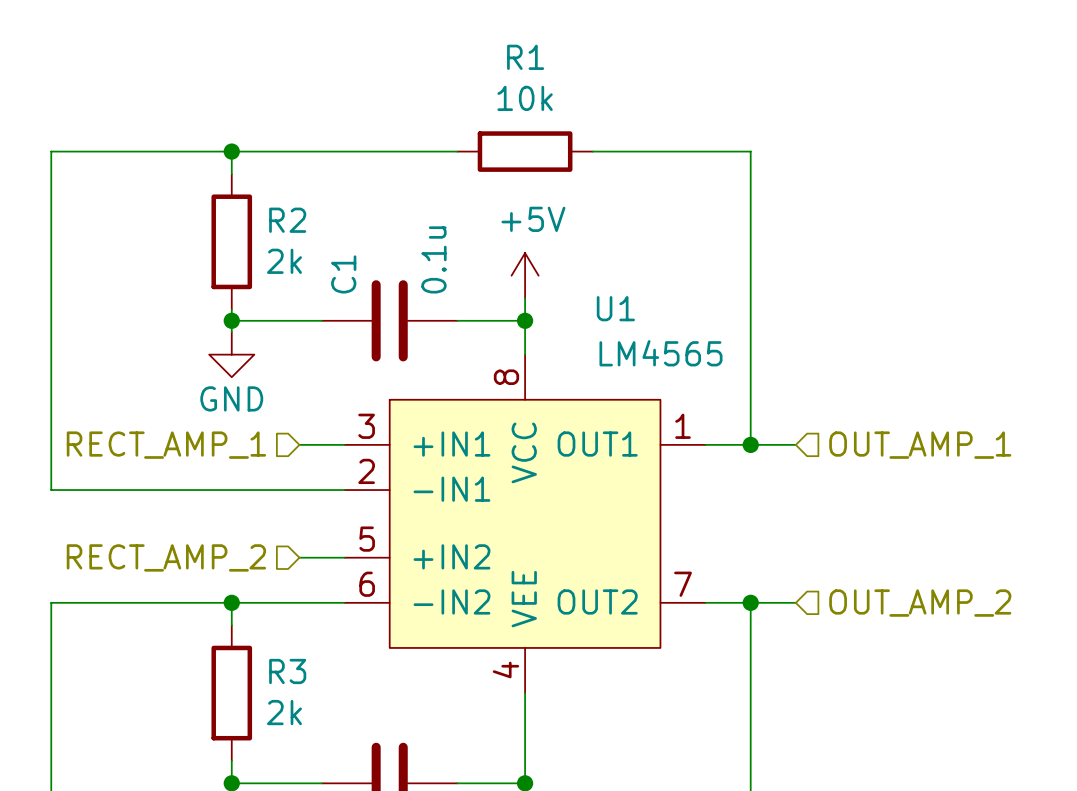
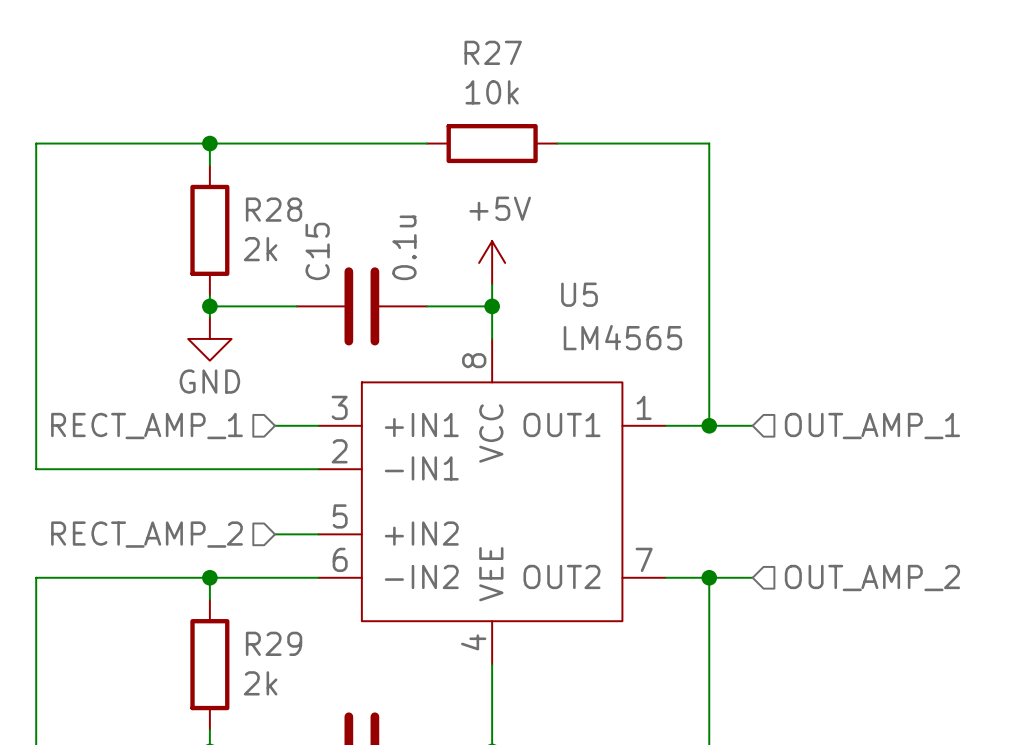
R1 name: R1 (525, 57) -> R27 (493, 52)
R2 name: R2 (287, 220) -> R28 (274, 209)
C1 name: C1 (343, 274) -> C15 (317, 251)
U1 name: U1 (615, 308) -> U5 (579, 294)
R3 name: R3 (287, 671) -> R29 (274, 643)

